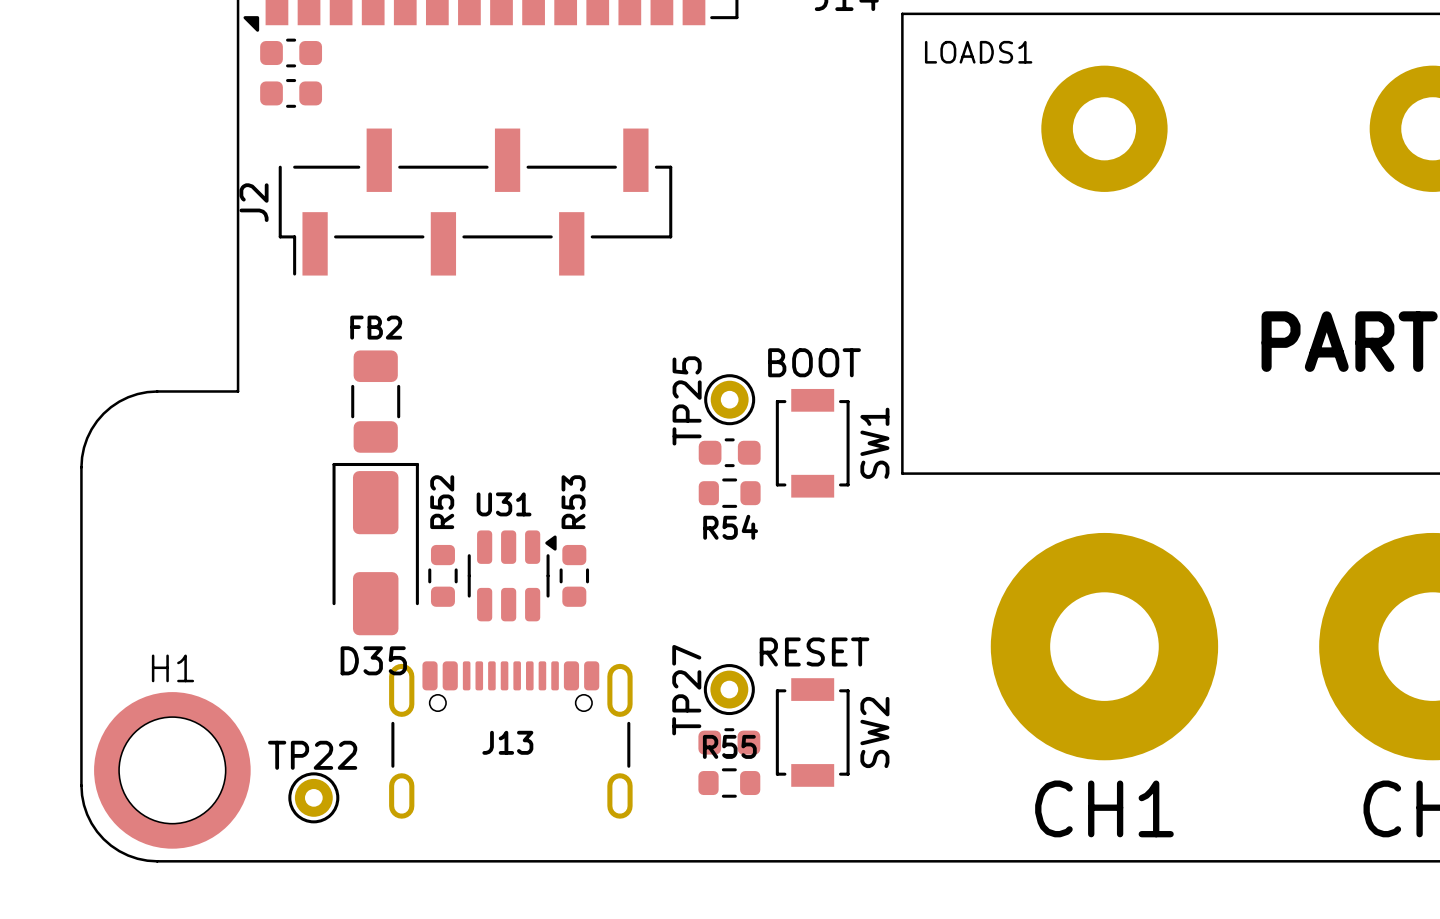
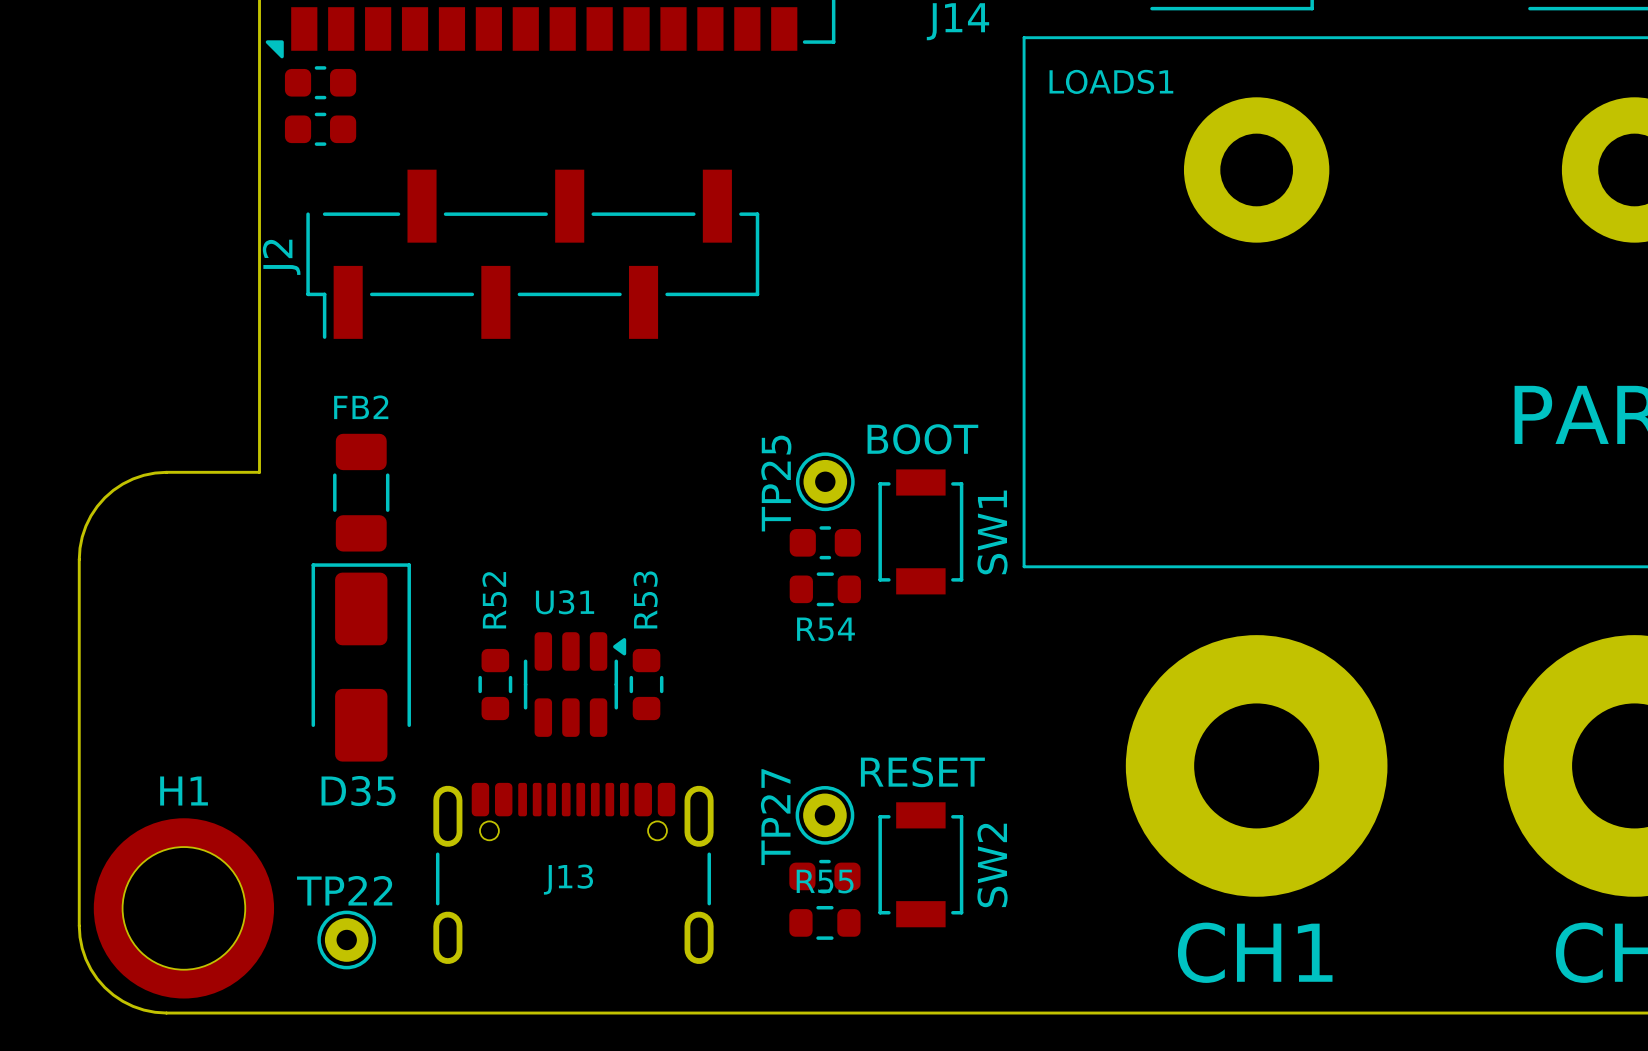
FB2 position: (375, 401) -> (361, 492)
D35 position: (375, 549) -> (361, 662)

